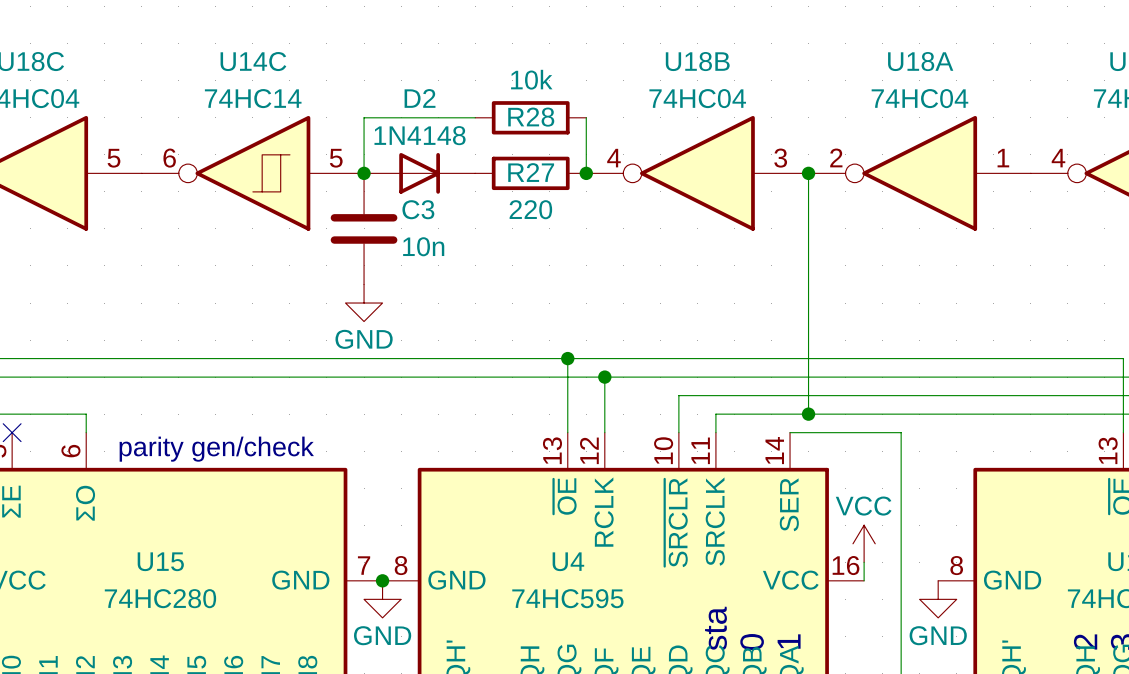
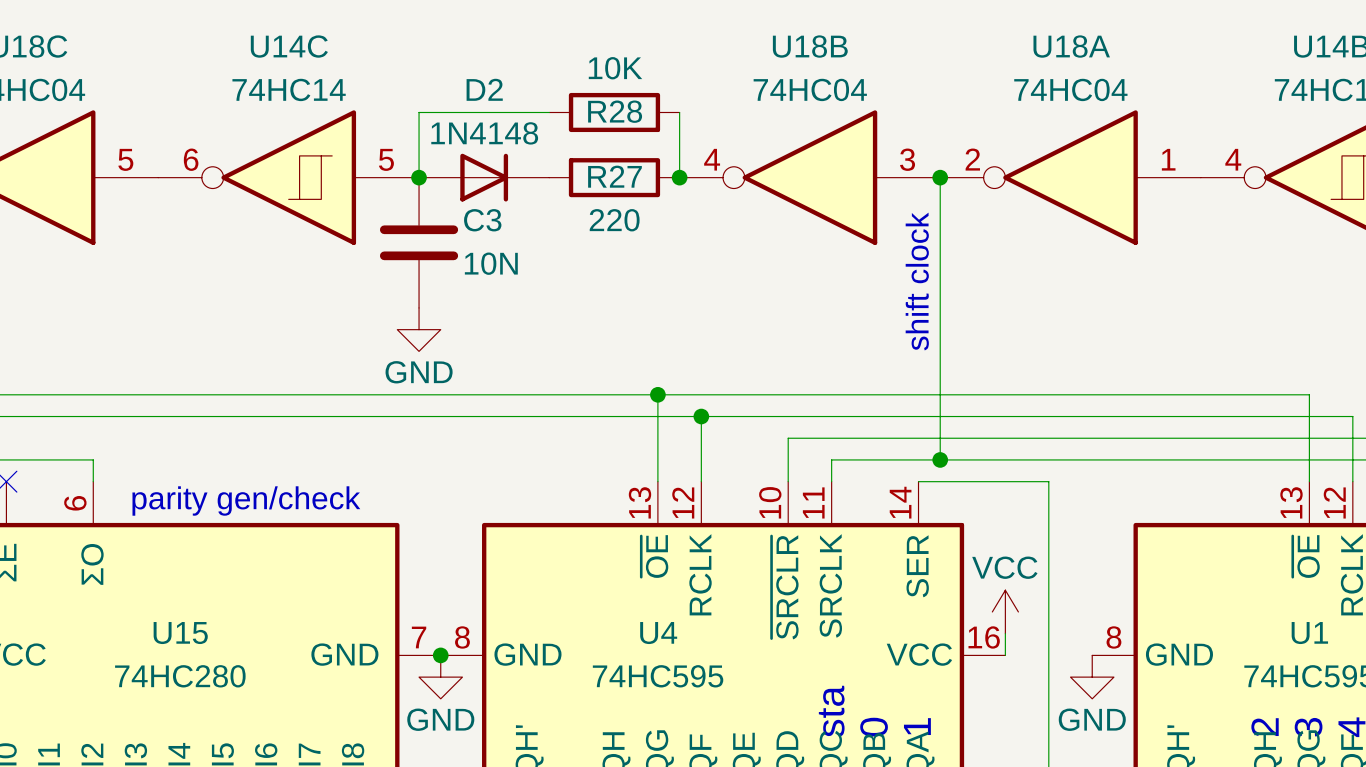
R28 value: 10k (531, 79) -> 10K (615, 68)
C3 value: 10n (423, 246) -> 10N (491, 263)
text: none -> shift clock (917, 281)

